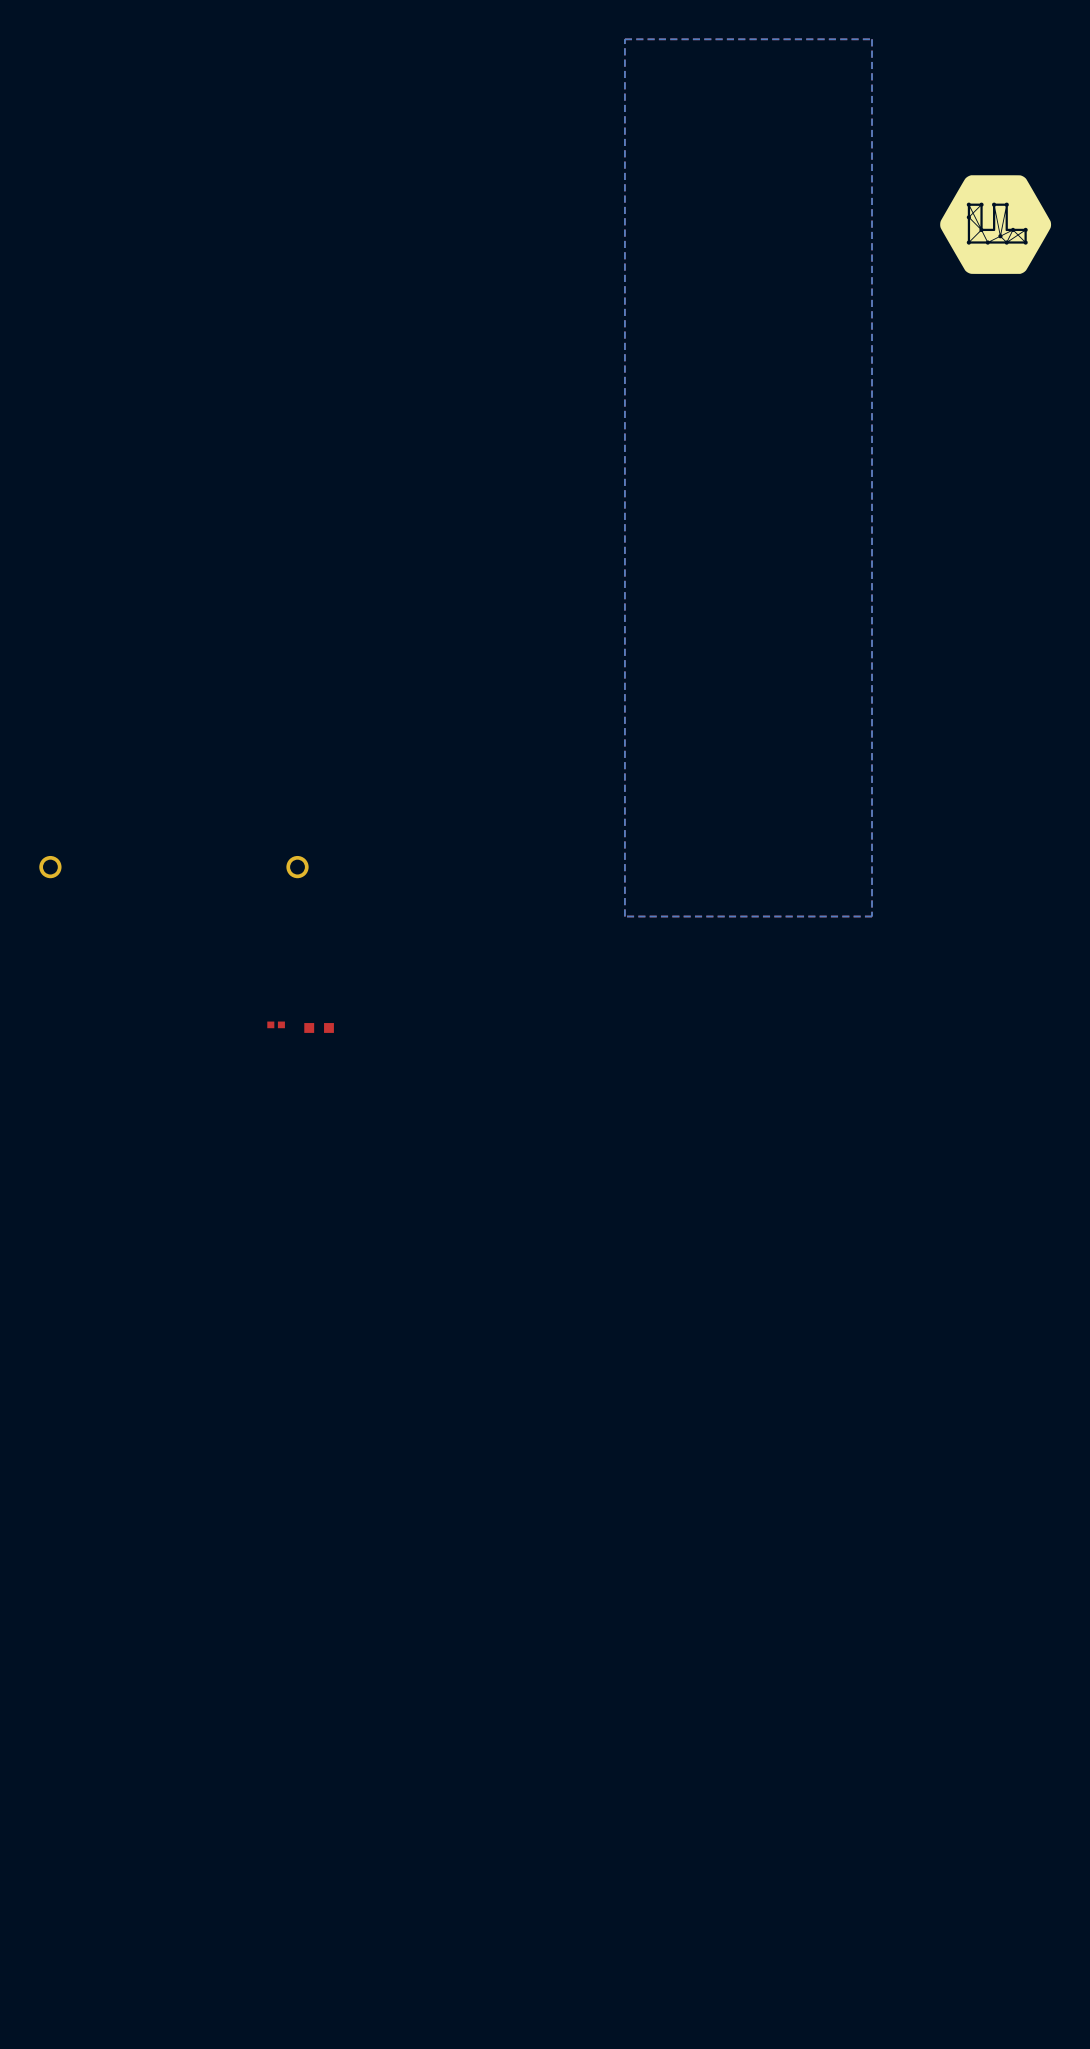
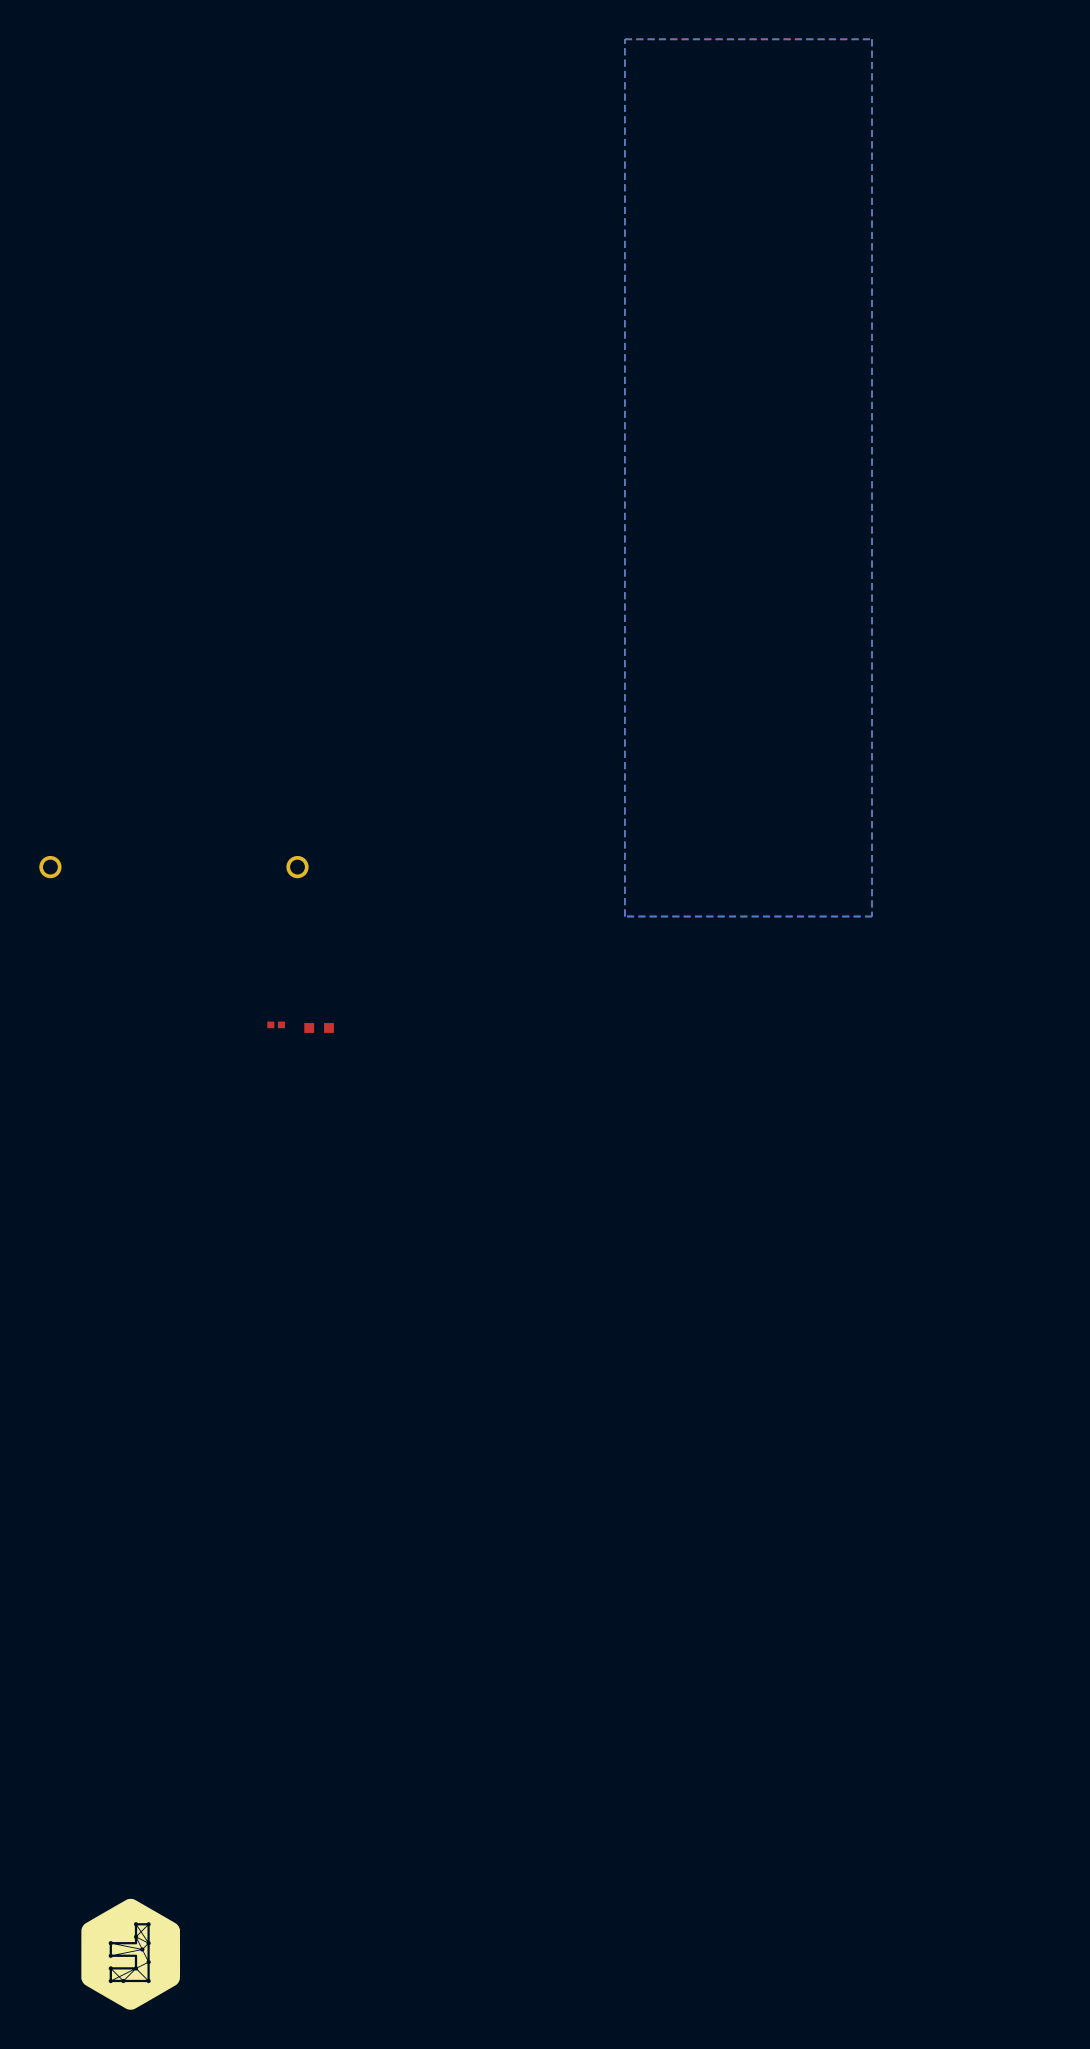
drawing: [940, 175, 1052, 274] -> none
drawing: none -> [81, 1898, 181, 2010]

